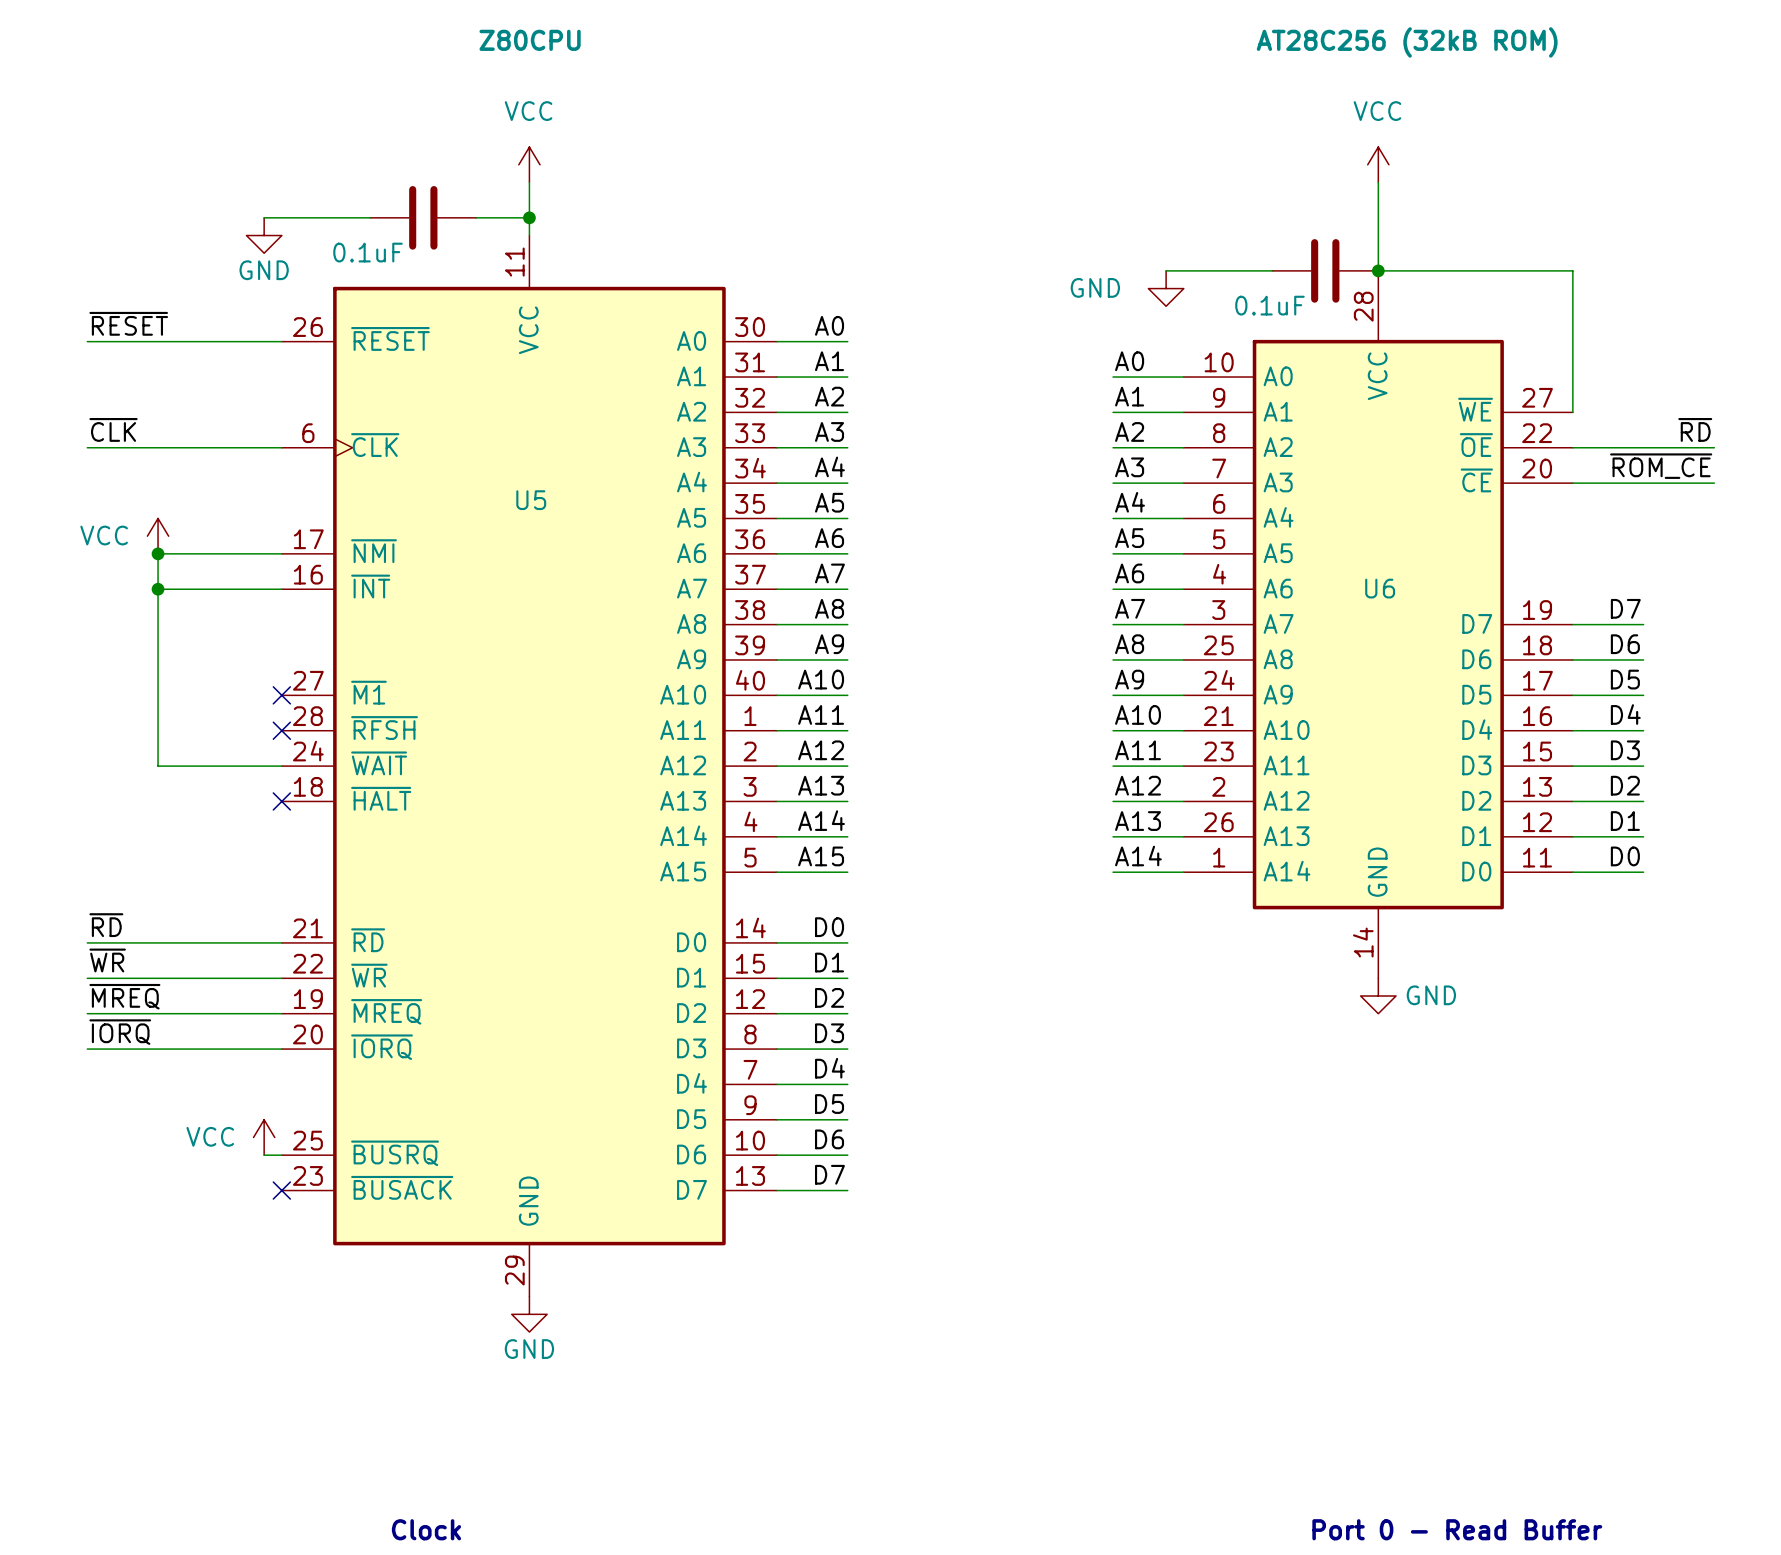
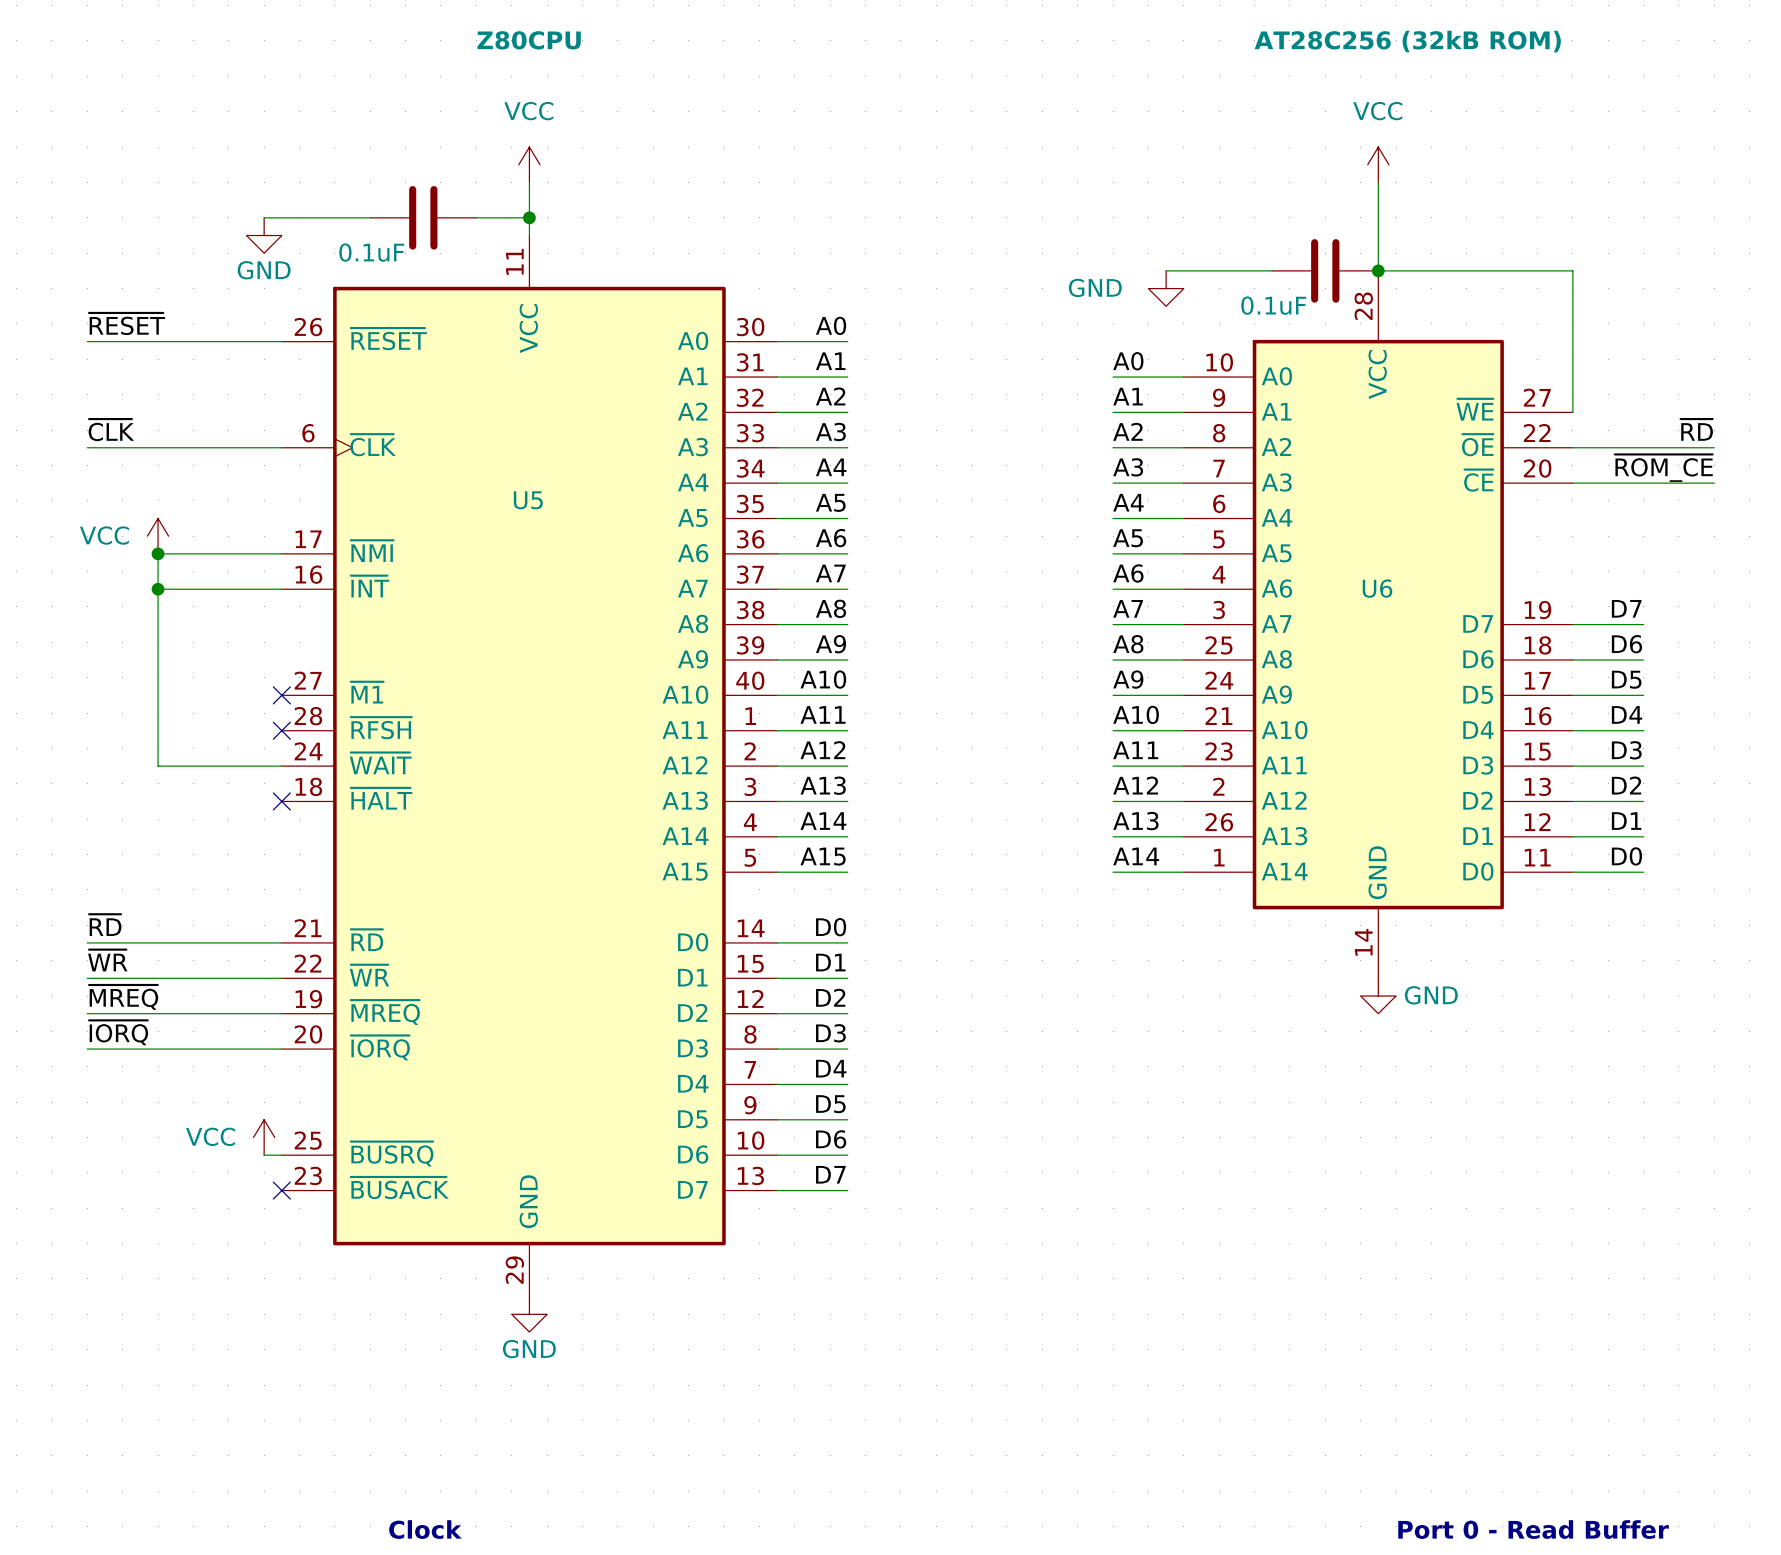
text position: Port 0 - Read Buffer (1457, 1529) -> Port 0 - Read Buffer (1533, 1529)

